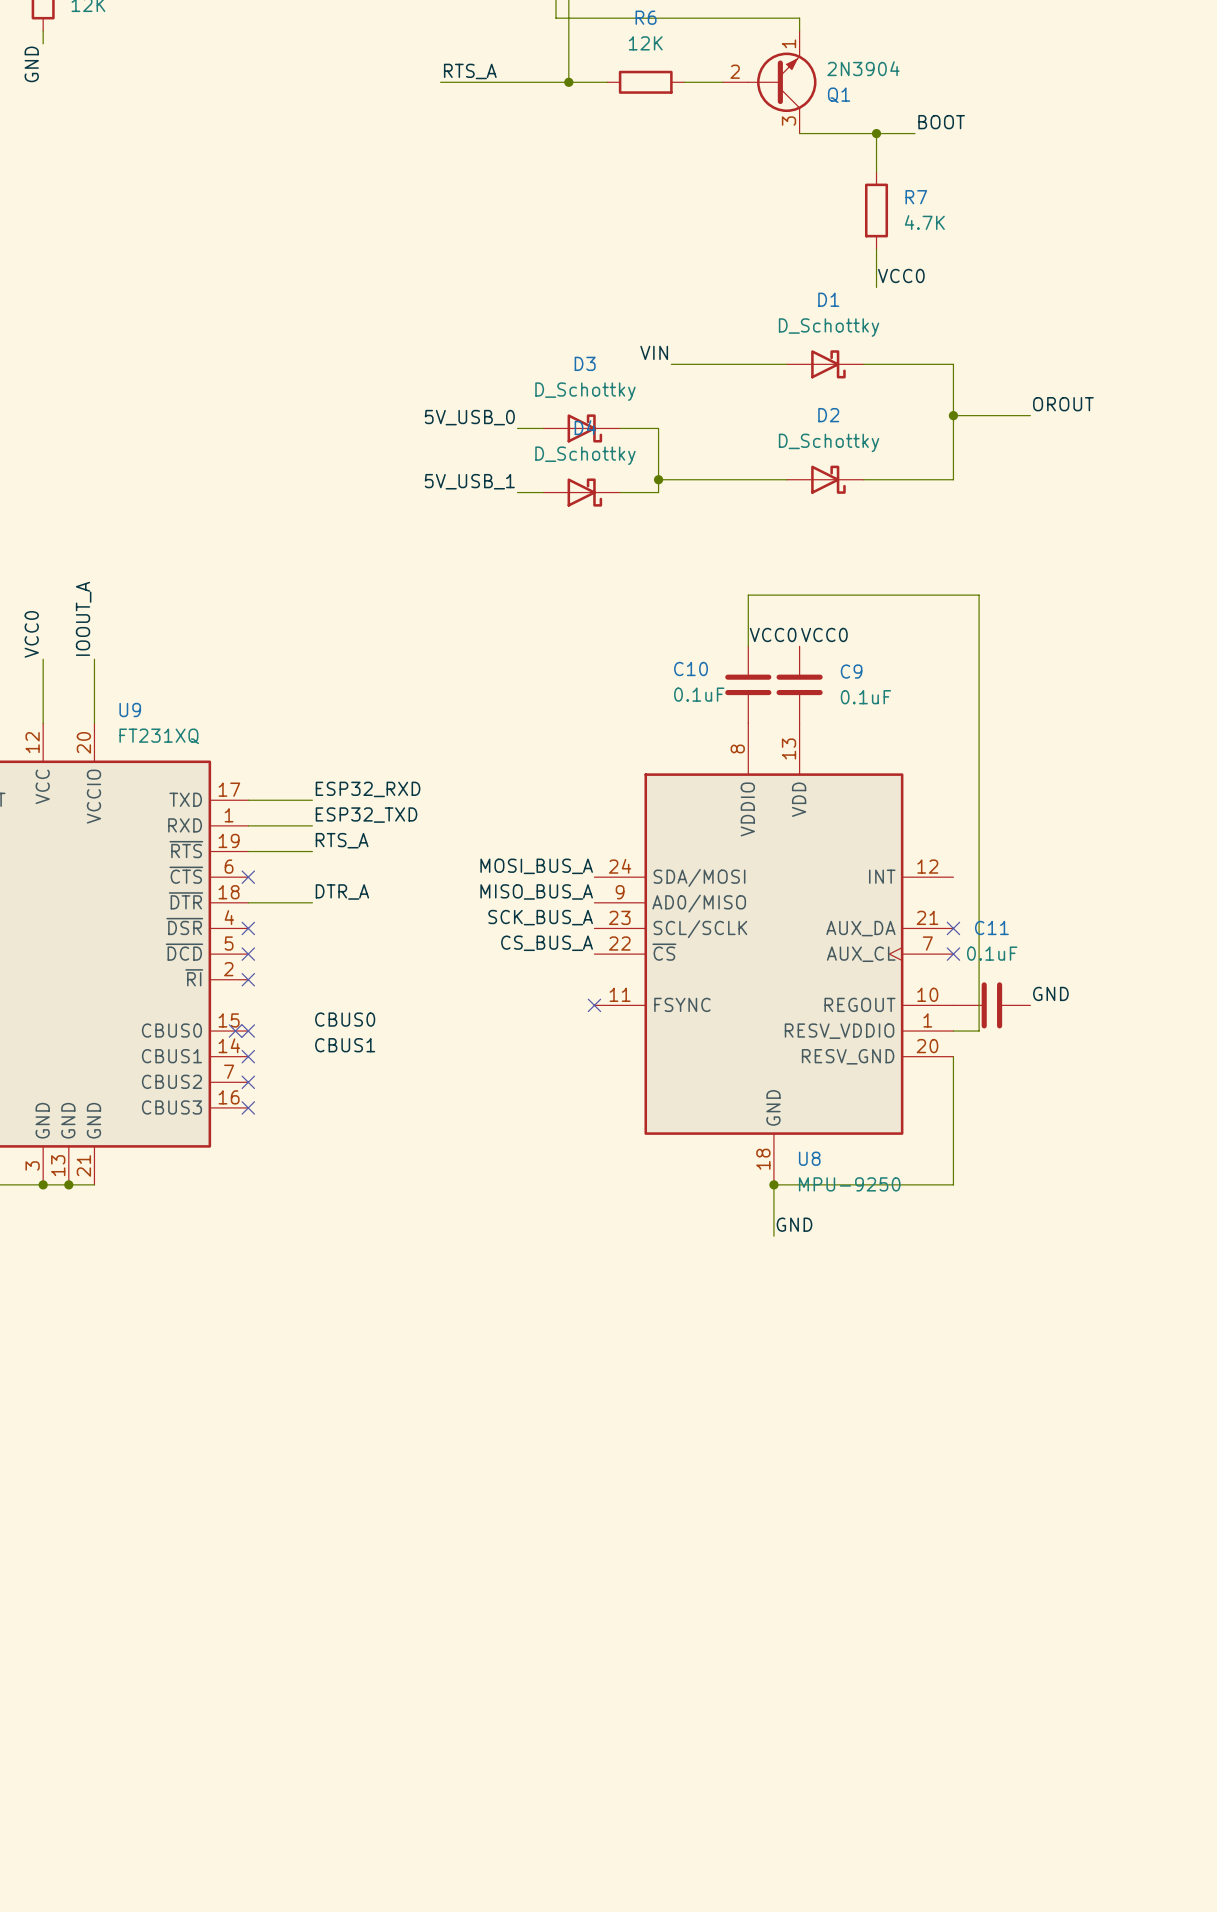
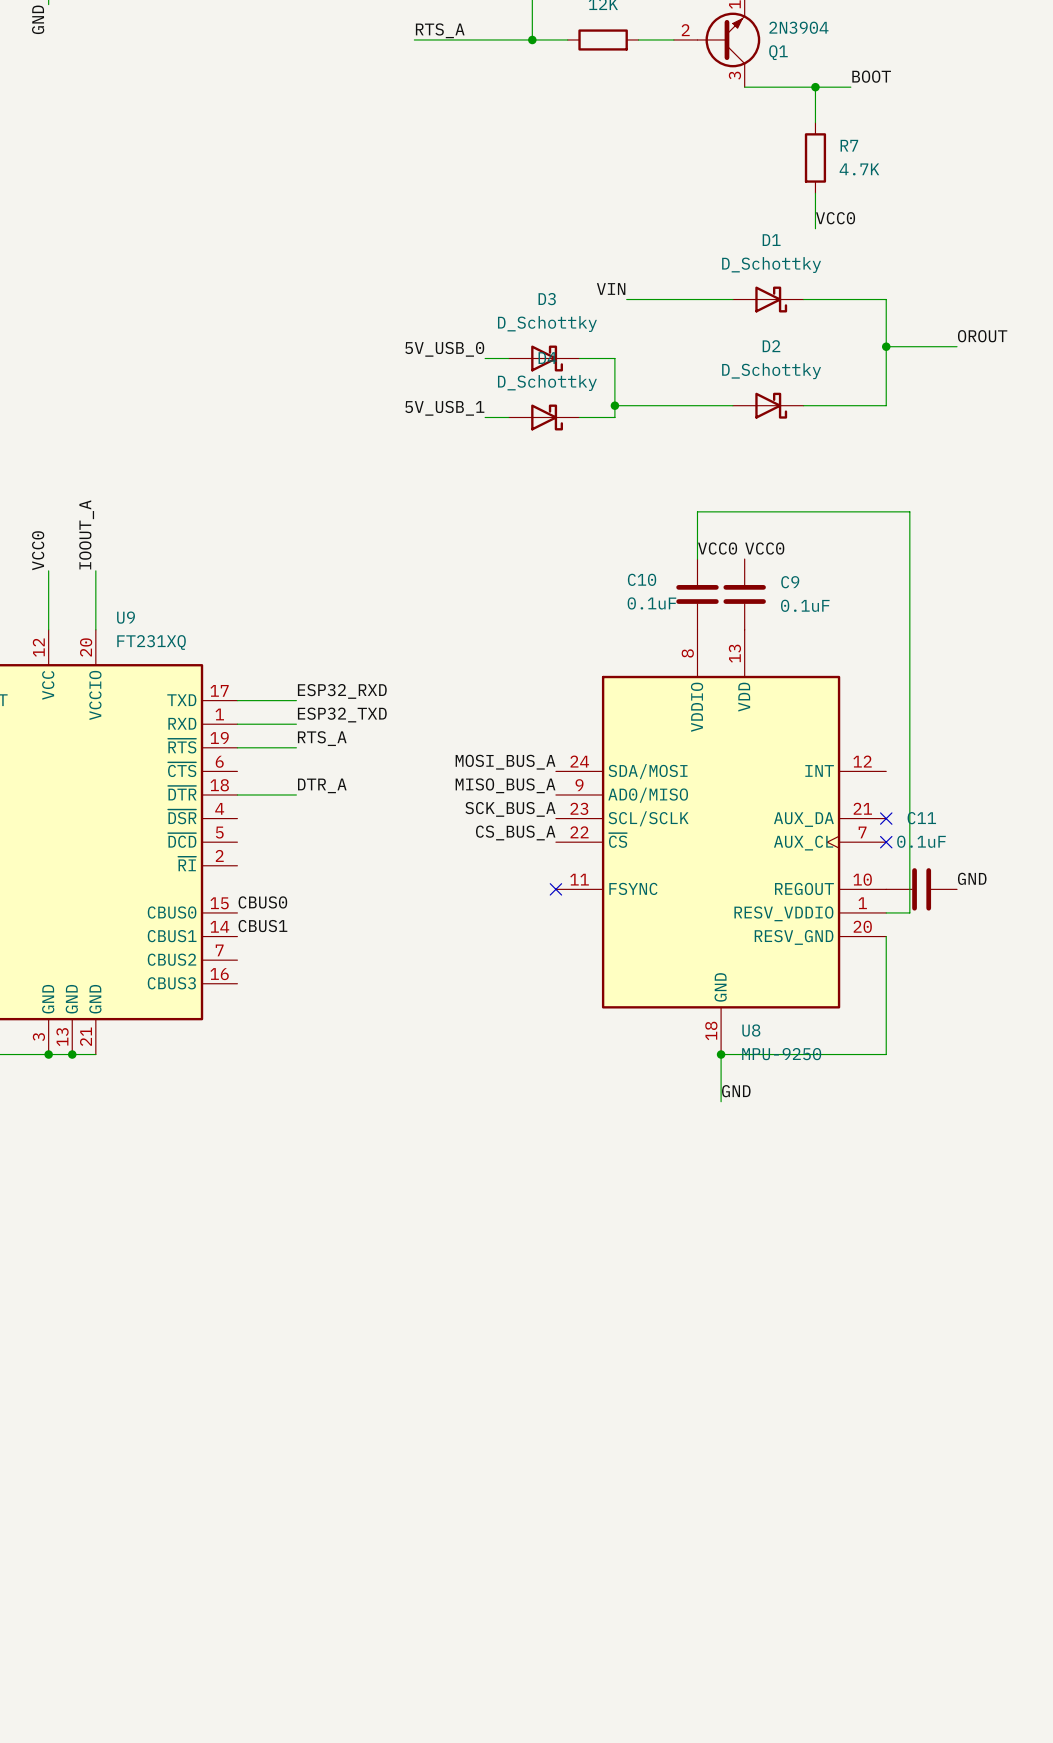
no-connect mark: (248, 877) -> none
no-connect mark: (248, 928) -> none
no-connect mark: (248, 954) -> none
no-connect mark: (248, 979) -> none
label position: CBUS0 (345, 1019) -> CBUS0 (262, 902)
no-connect mark: (235, 1031) -> none
no-connect mark: (248, 1031) -> none
label position: CBUS1 (345, 1045) -> CBUS1 (262, 926)
no-connect mark: (248, 1056) -> none
no-connect mark: (248, 1082) -> none
no-connect mark: (248, 1107) -> none

